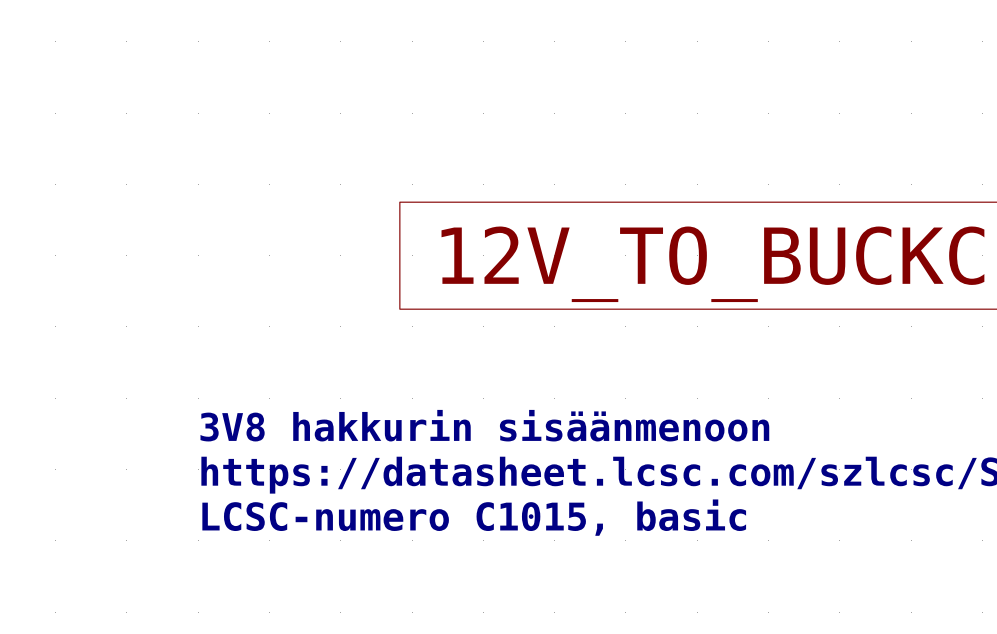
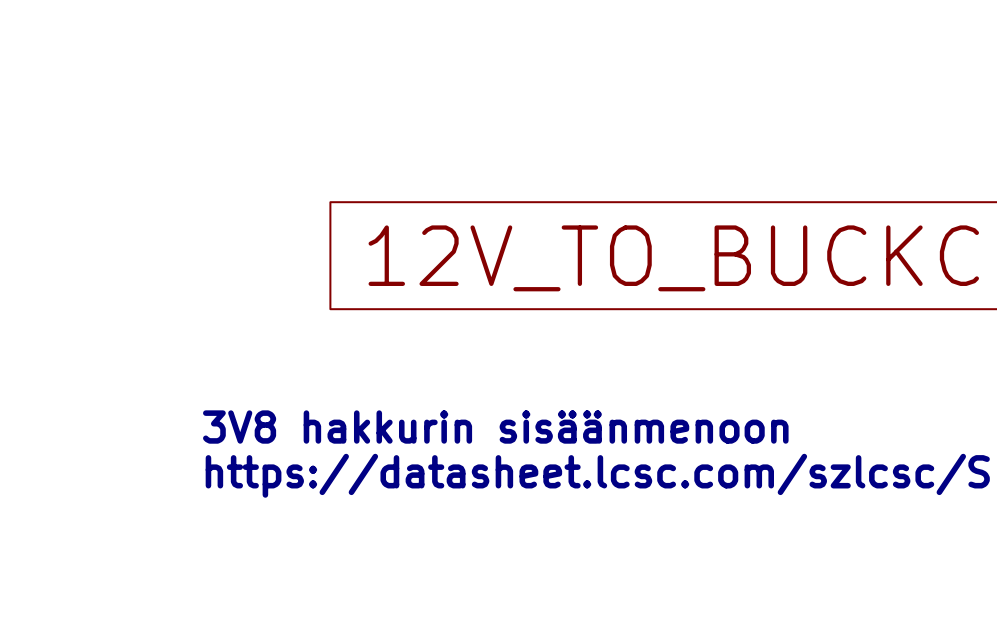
text: LCSC-numero C1015, basic (474, 517) -> none

